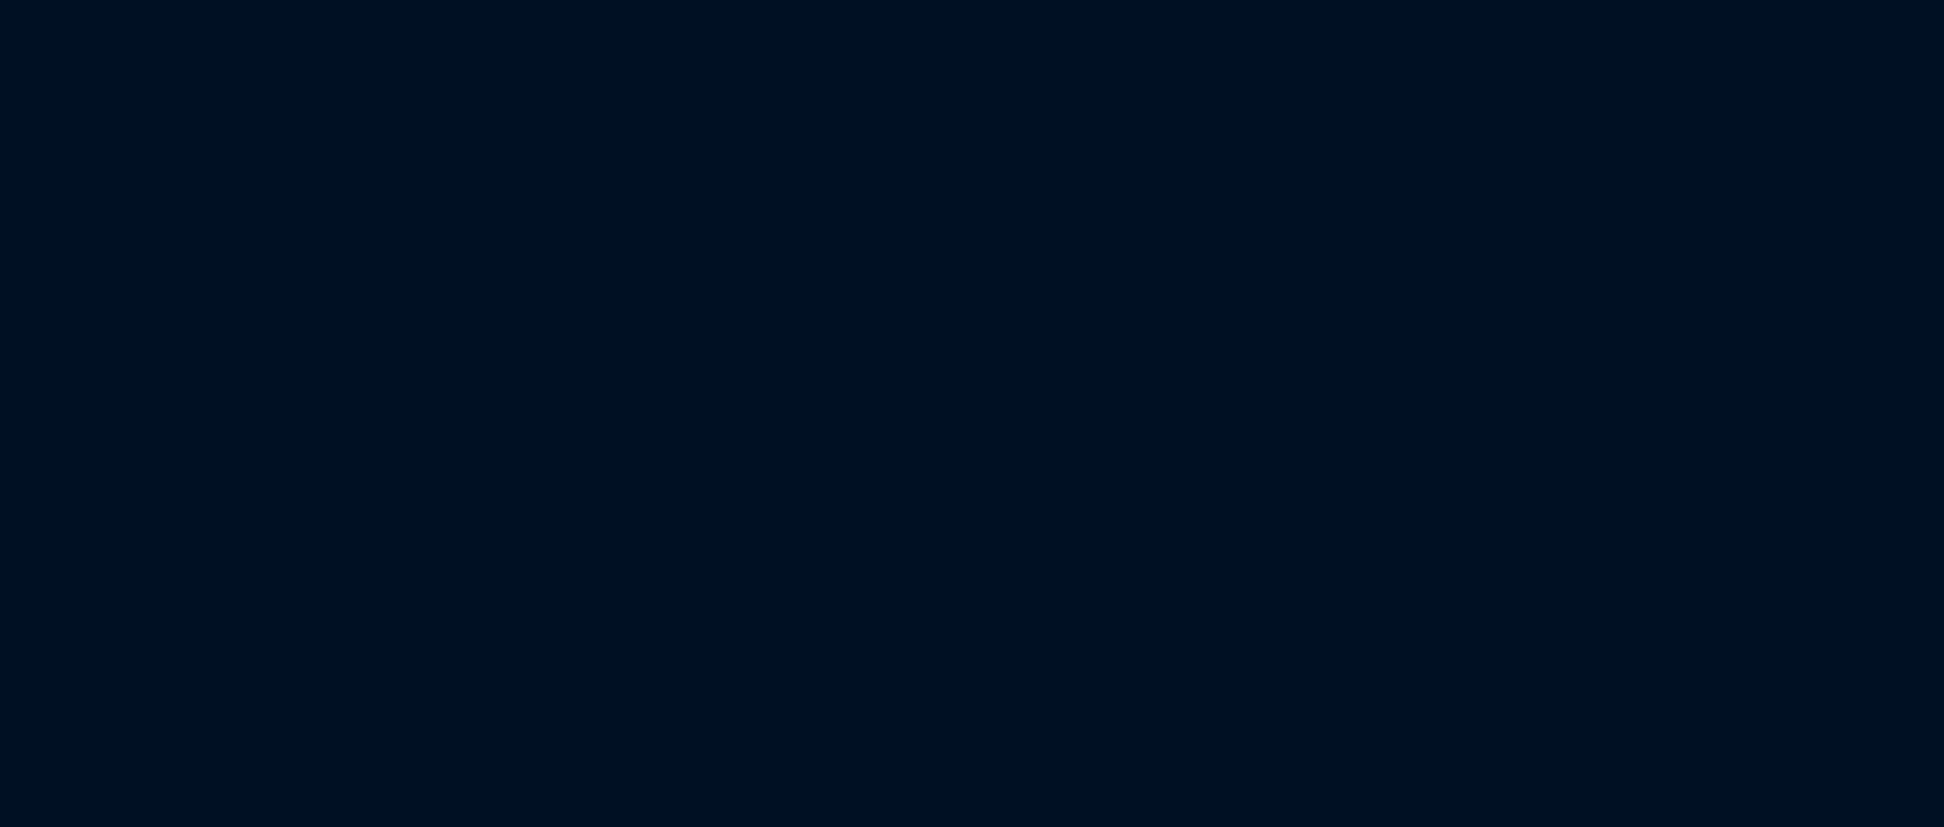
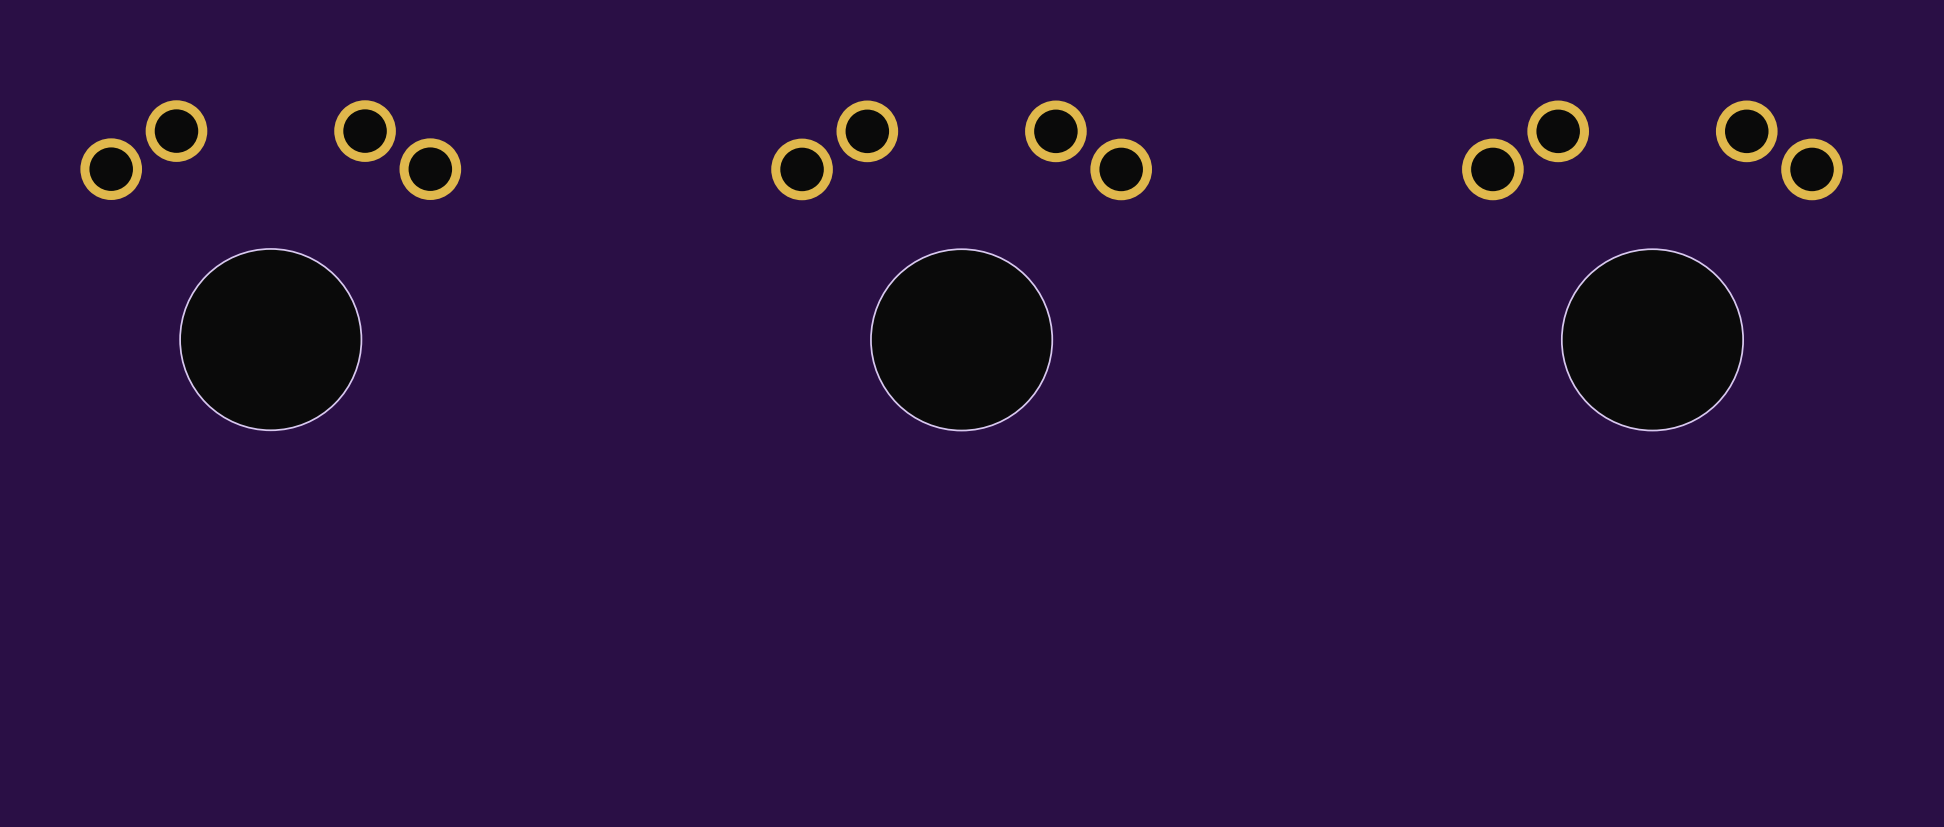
part: none -> (270, 265)
part: none -> (961, 265)
part: none -> (1652, 265)

